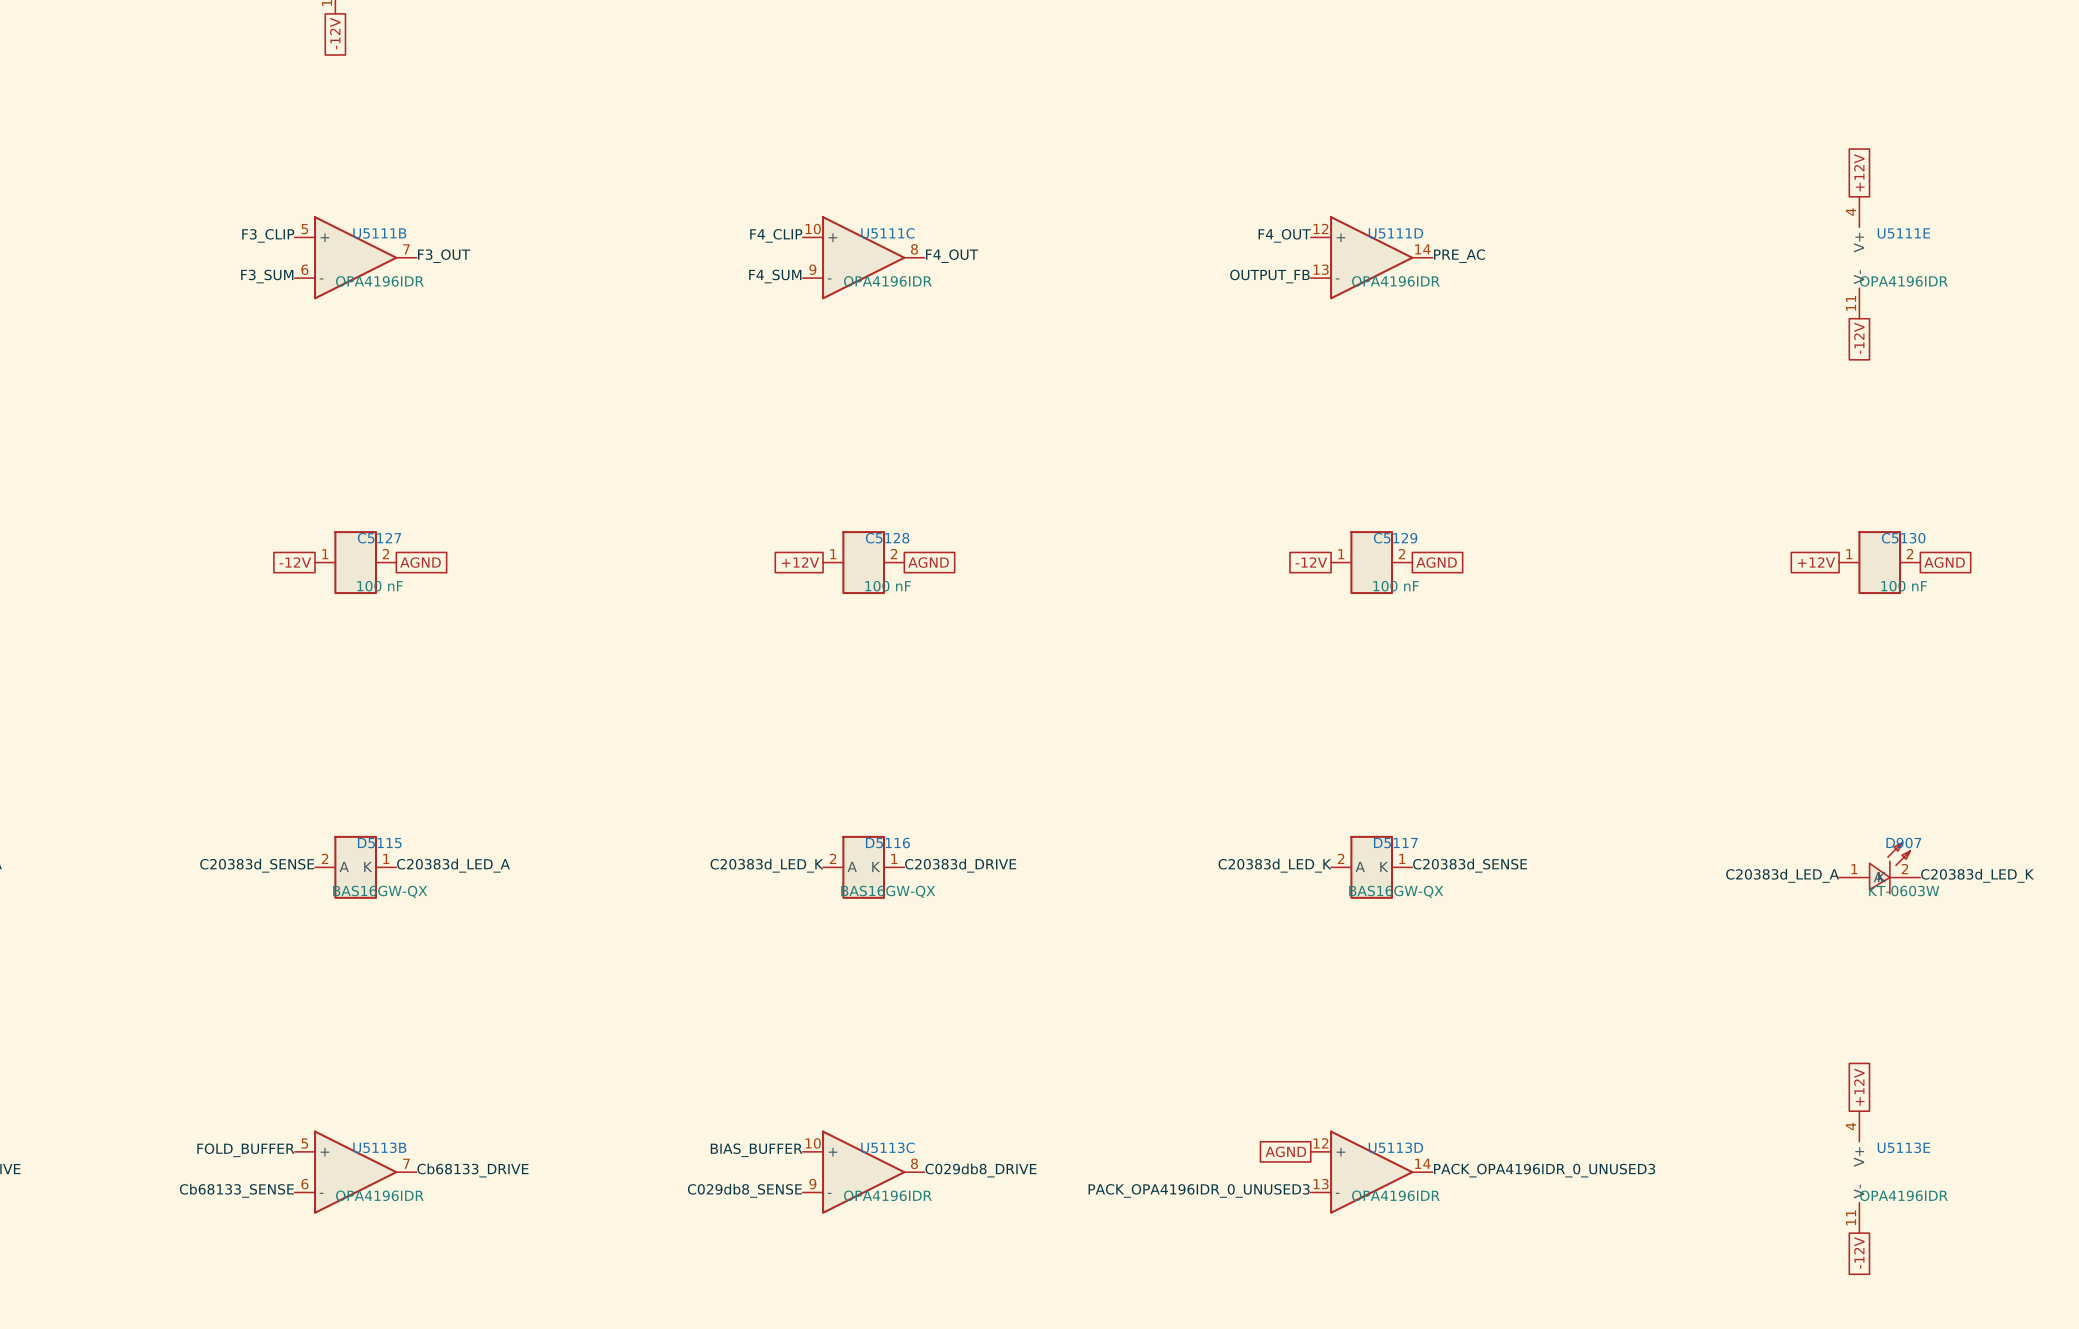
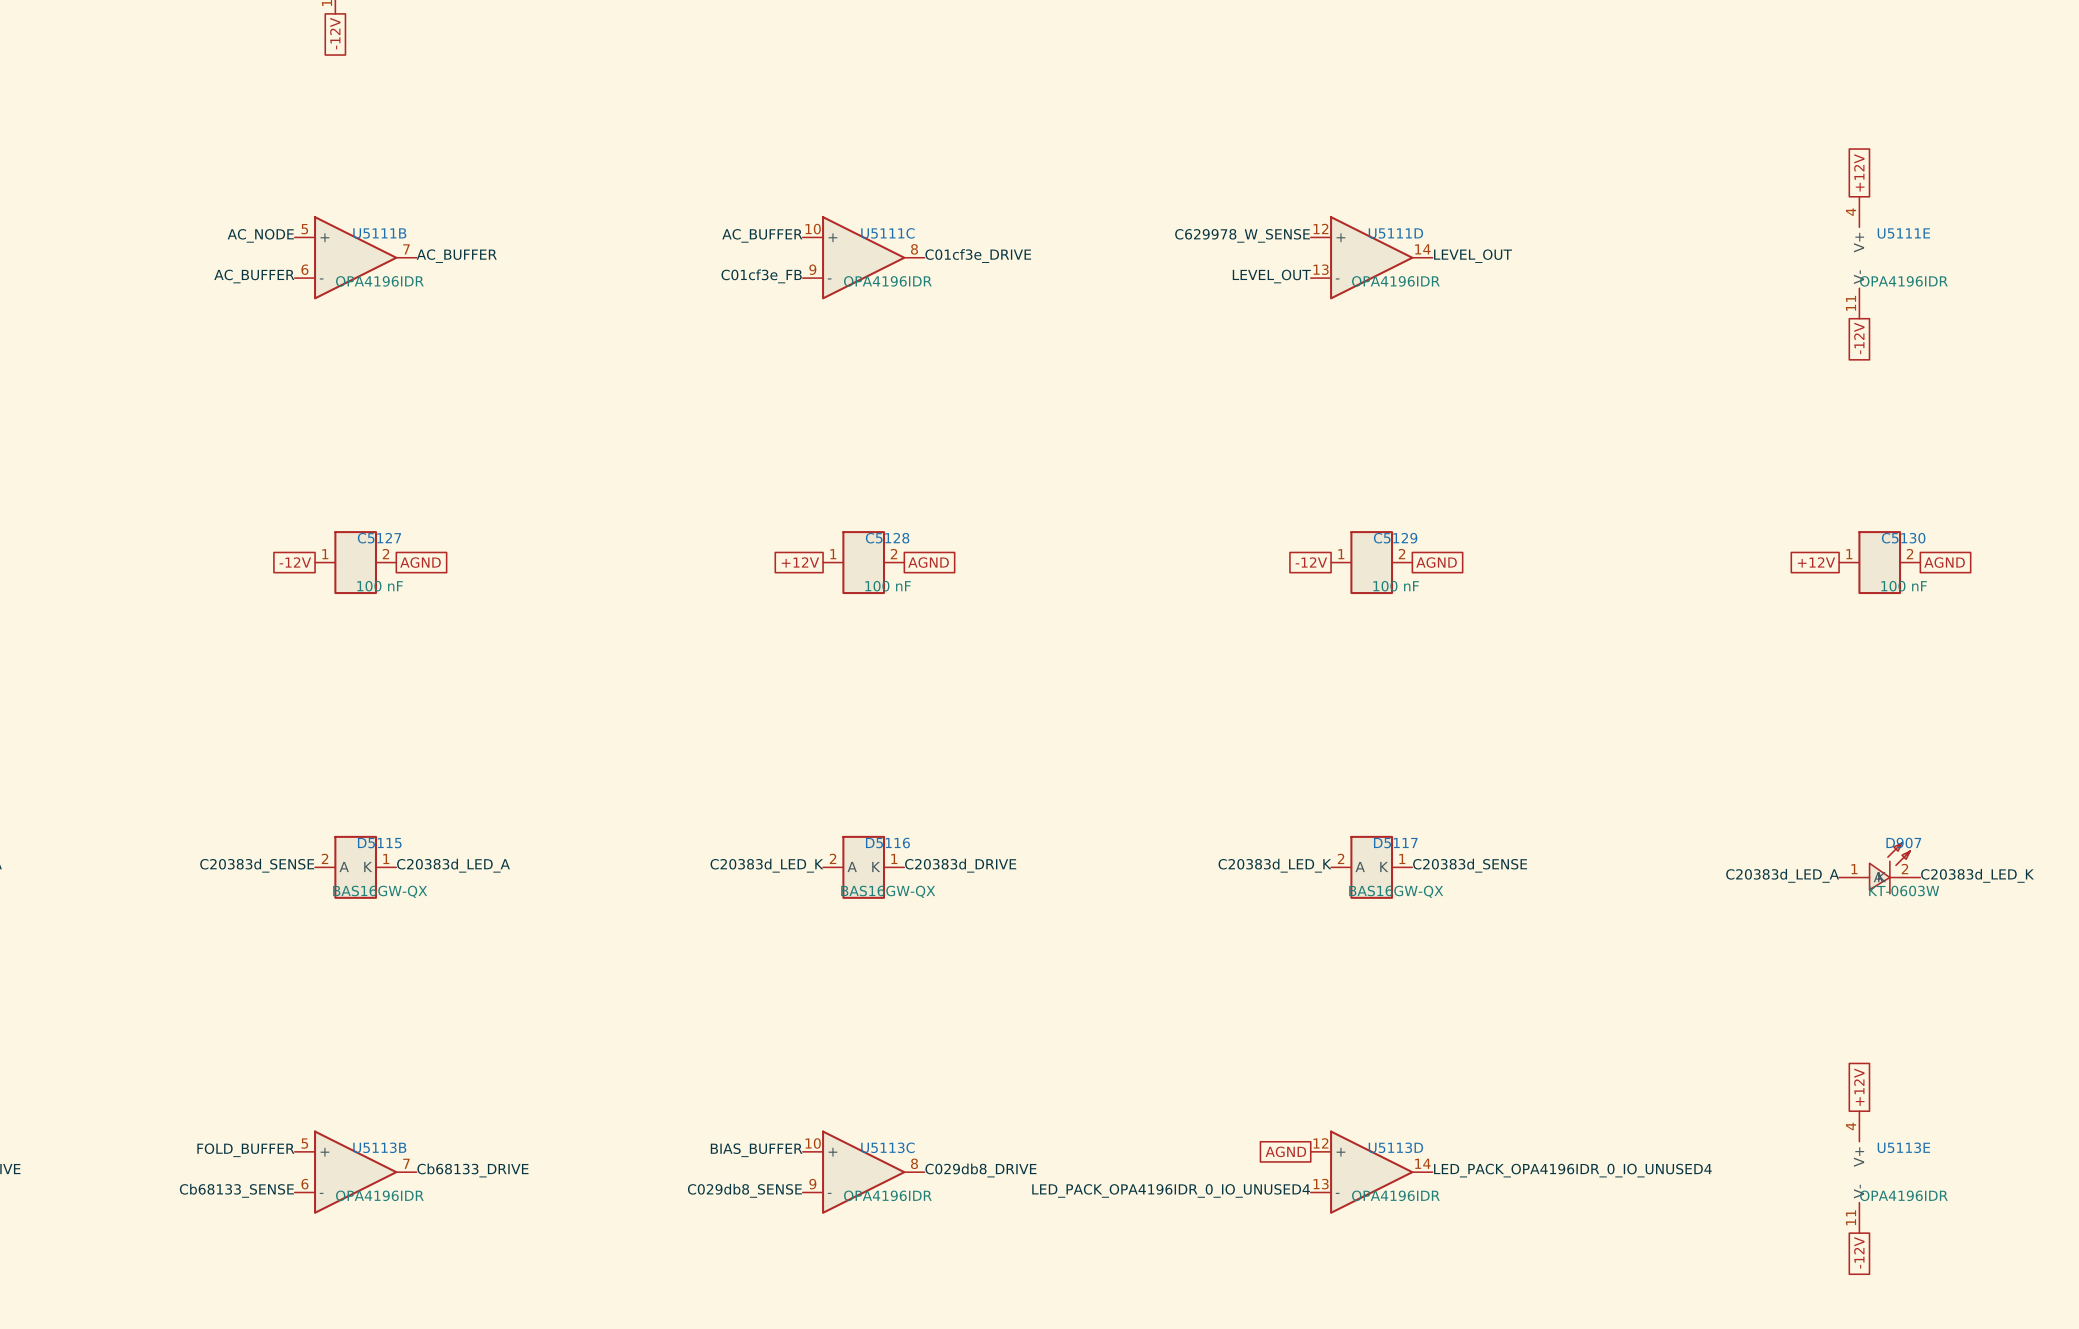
label: F3_CLIP (268, 235) -> AC_NODE (260, 235)
label: F4_CLIP (776, 235) -> AC_BUFFER (762, 235)
label: F4_OUT (1284, 235) -> C629978_W_SENSE (1242, 235)
label: F3_OUT (444, 256) -> AC_BUFFER (456, 256)
label: F4_OUT (952, 256) -> C01cf3e_DRIVE (978, 256)
label: PRE_AC (1459, 256) -> LEVEL_OUT (1473, 256)
label: F3_SUM (267, 276) -> AC_BUFFER (254, 276)
label: F4_SUM (775, 276) -> C01cf3e_FB (761, 276)
label: OUTPUT_FB (1269, 276) -> LEVEL_OUT (1271, 276)
label: PACK_OPA4196IDR_0_UNUSED3 (1544, 1170) -> LED_PACK_OPA4196IDR_0_IO_UNUSED4 (1572, 1170)
label: PACK_OPA4196IDR_0_UNUSED3 (1199, 1190) -> LED_PACK_OPA4196IDR_0_IO_UNUSED4 (1171, 1190)

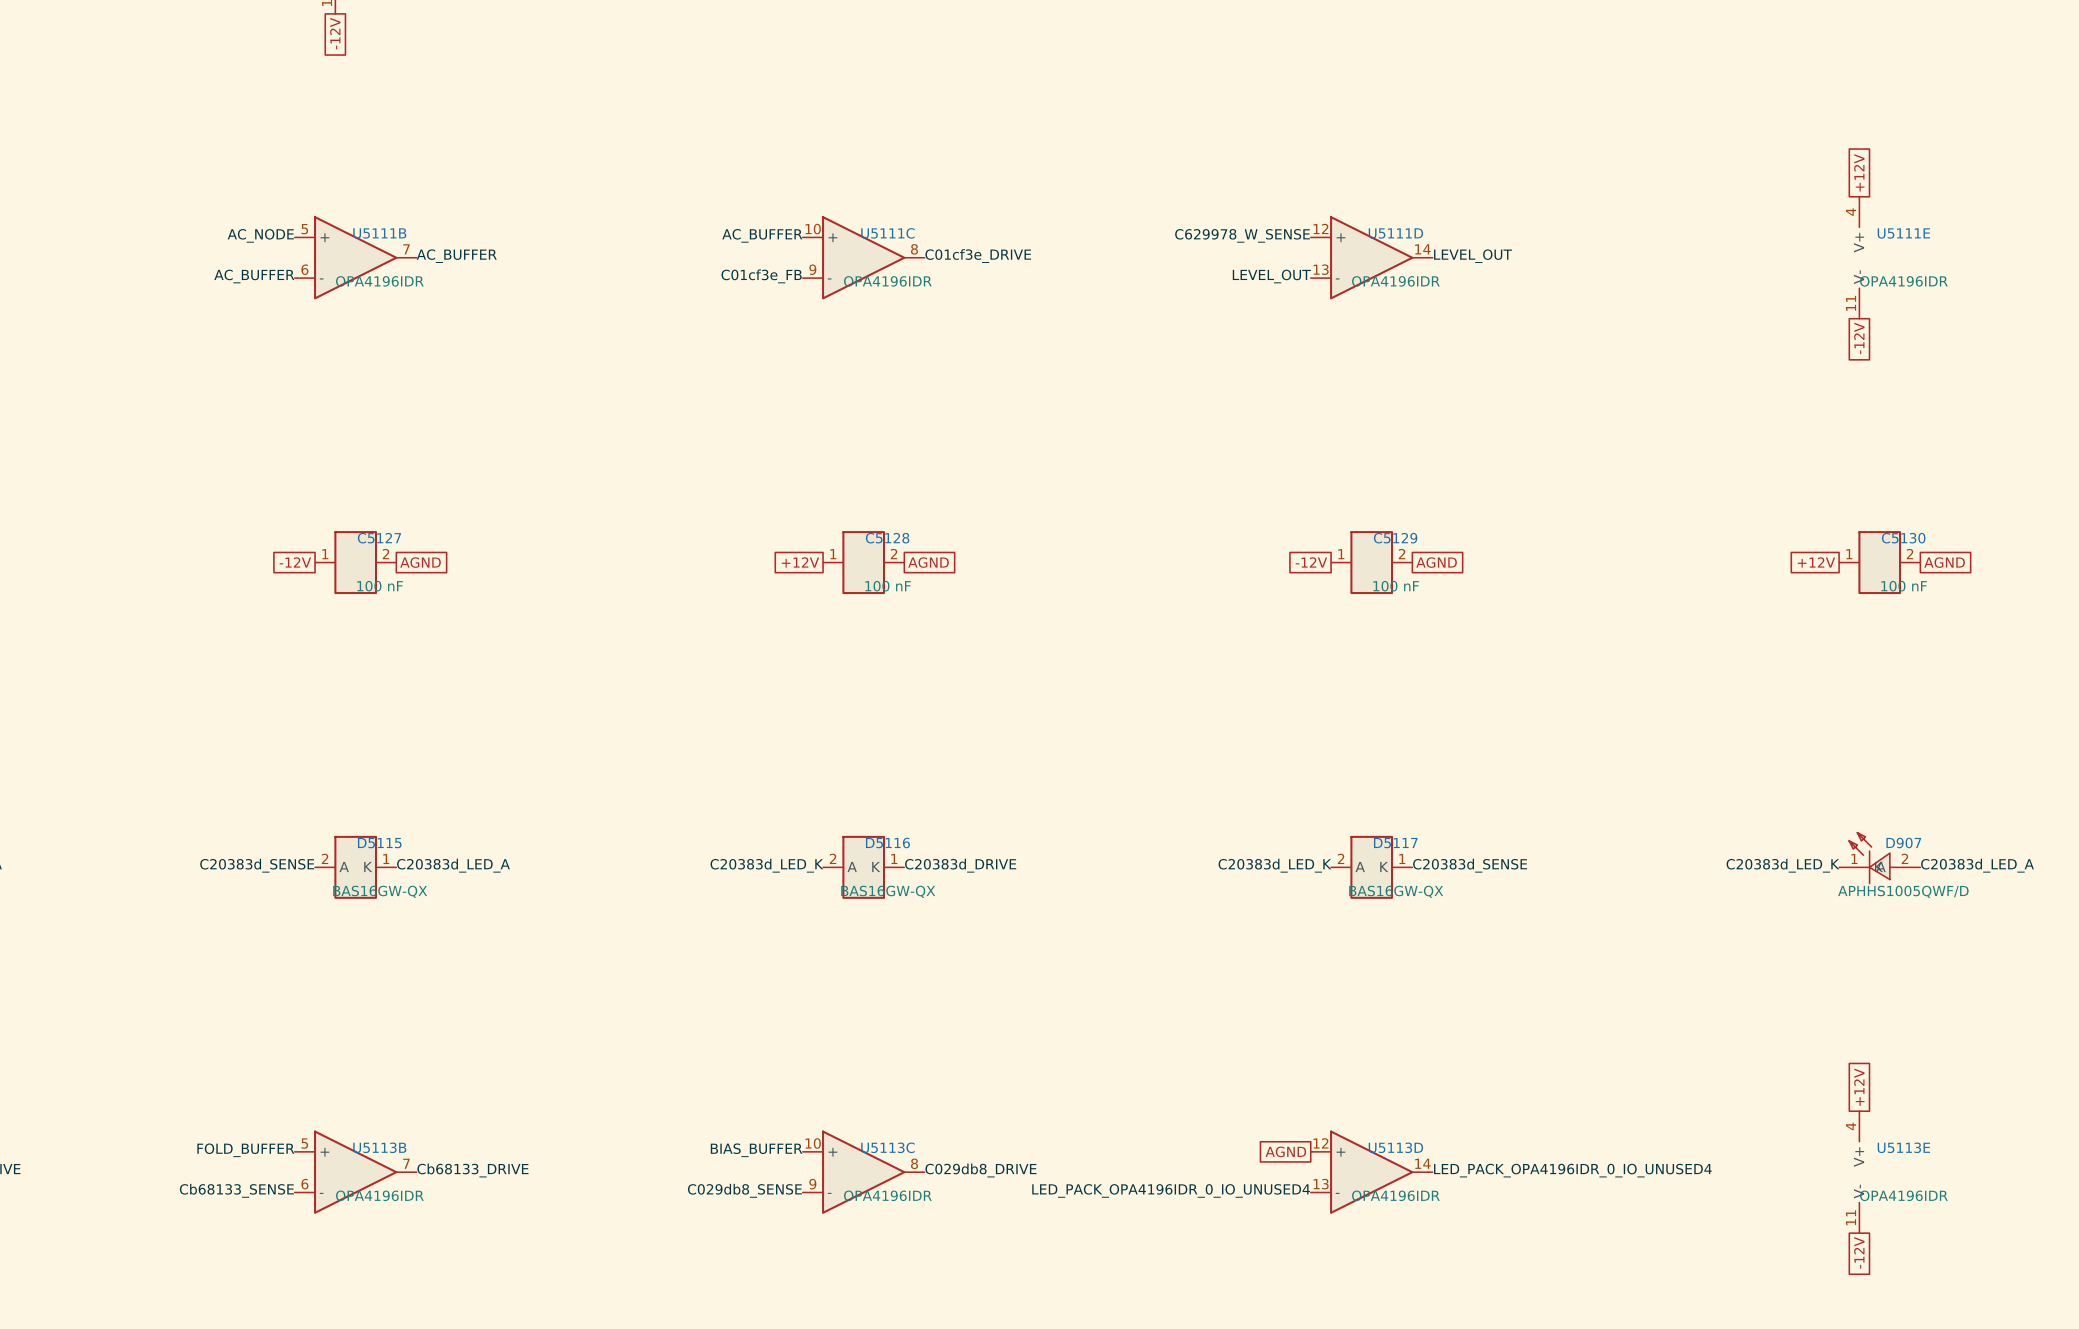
D907 symbol: [1839, 842, 1921, 894] -> [1839, 832, 1921, 884]
label position: C20383d_LED_A (1782, 875) -> C20383d_LED_A (1977, 865)
label position: C20383d_LED_K (1977, 875) -> C20383d_LED_K (1782, 865)
D907 value: KT-0603W (1904, 891) -> APHHS1005QWF/D (1903, 891)

